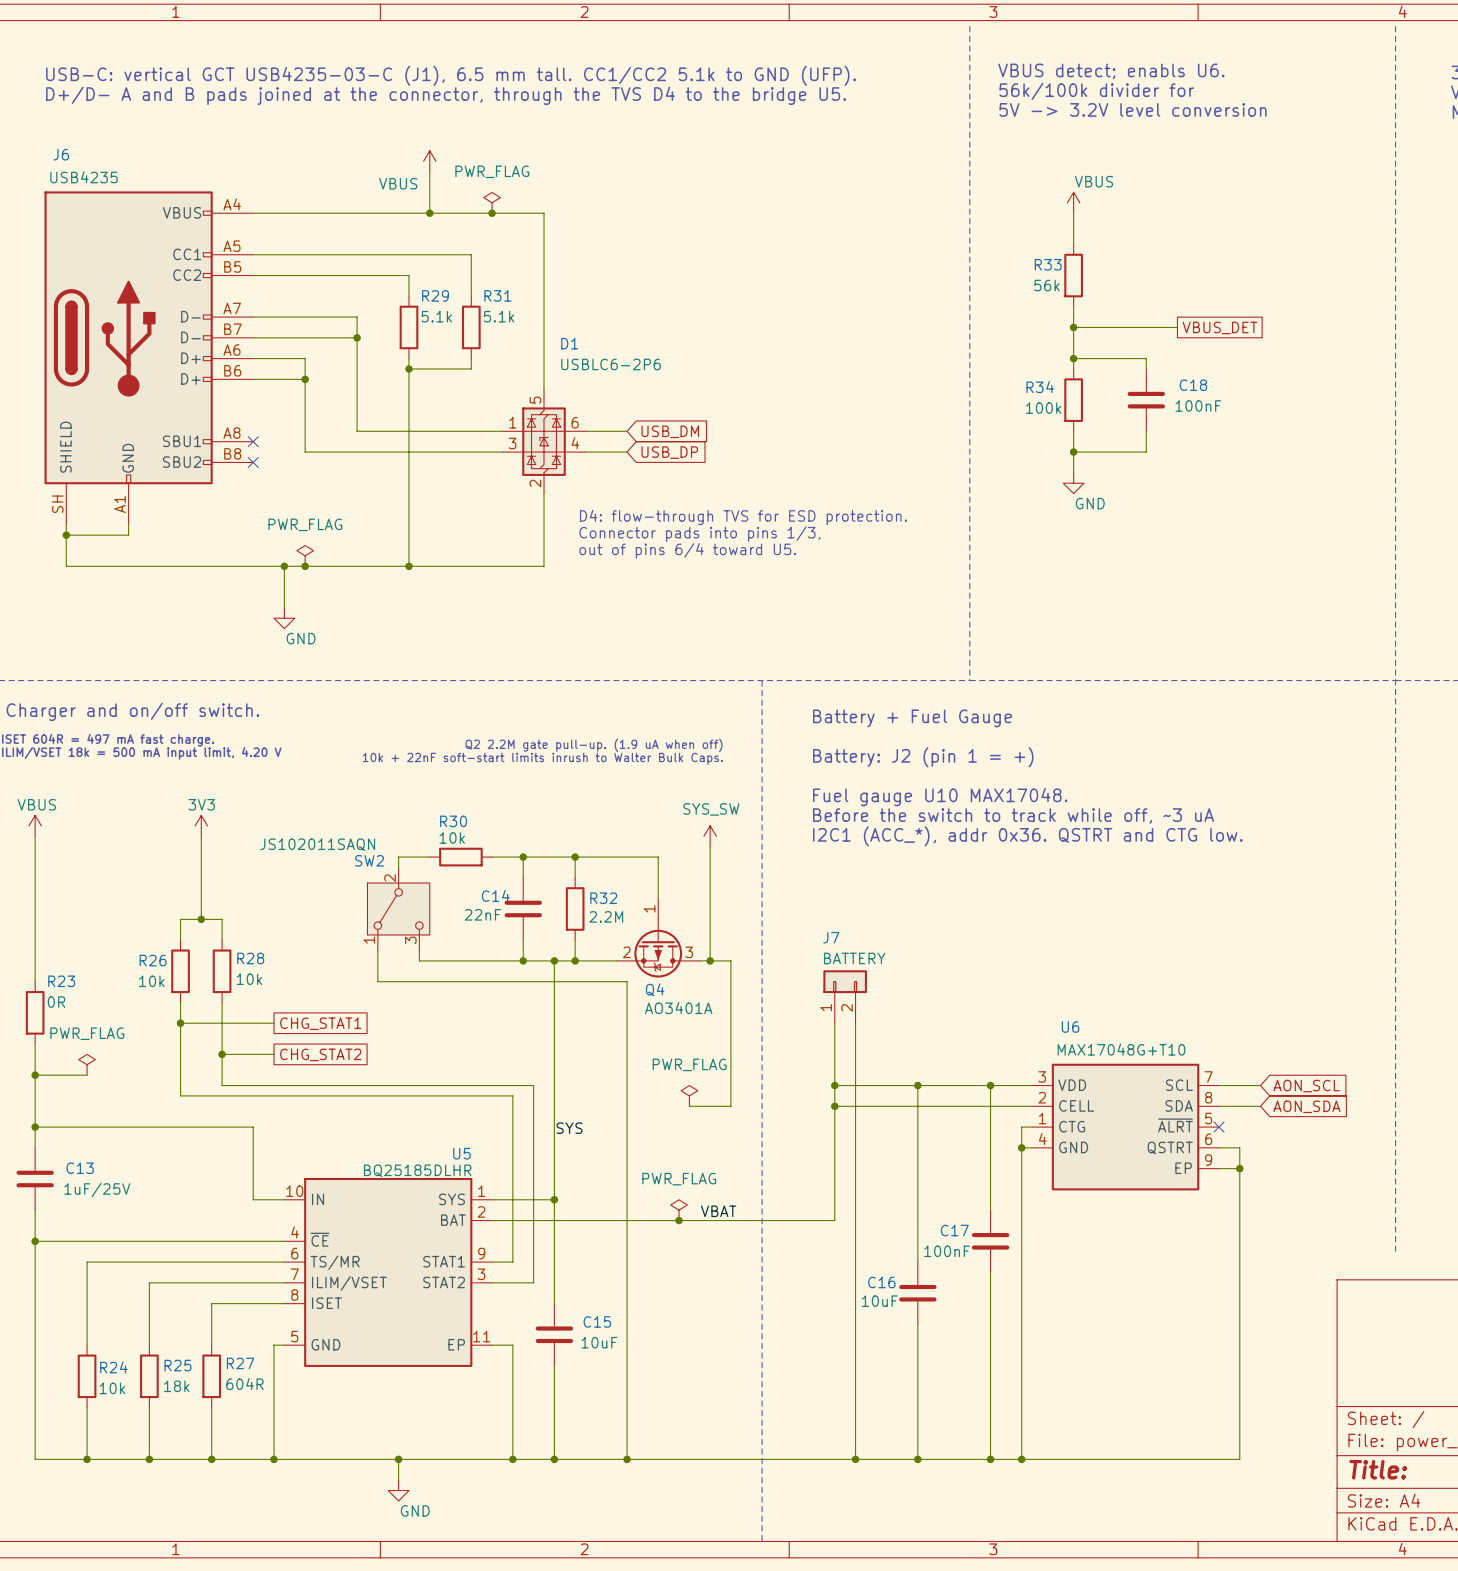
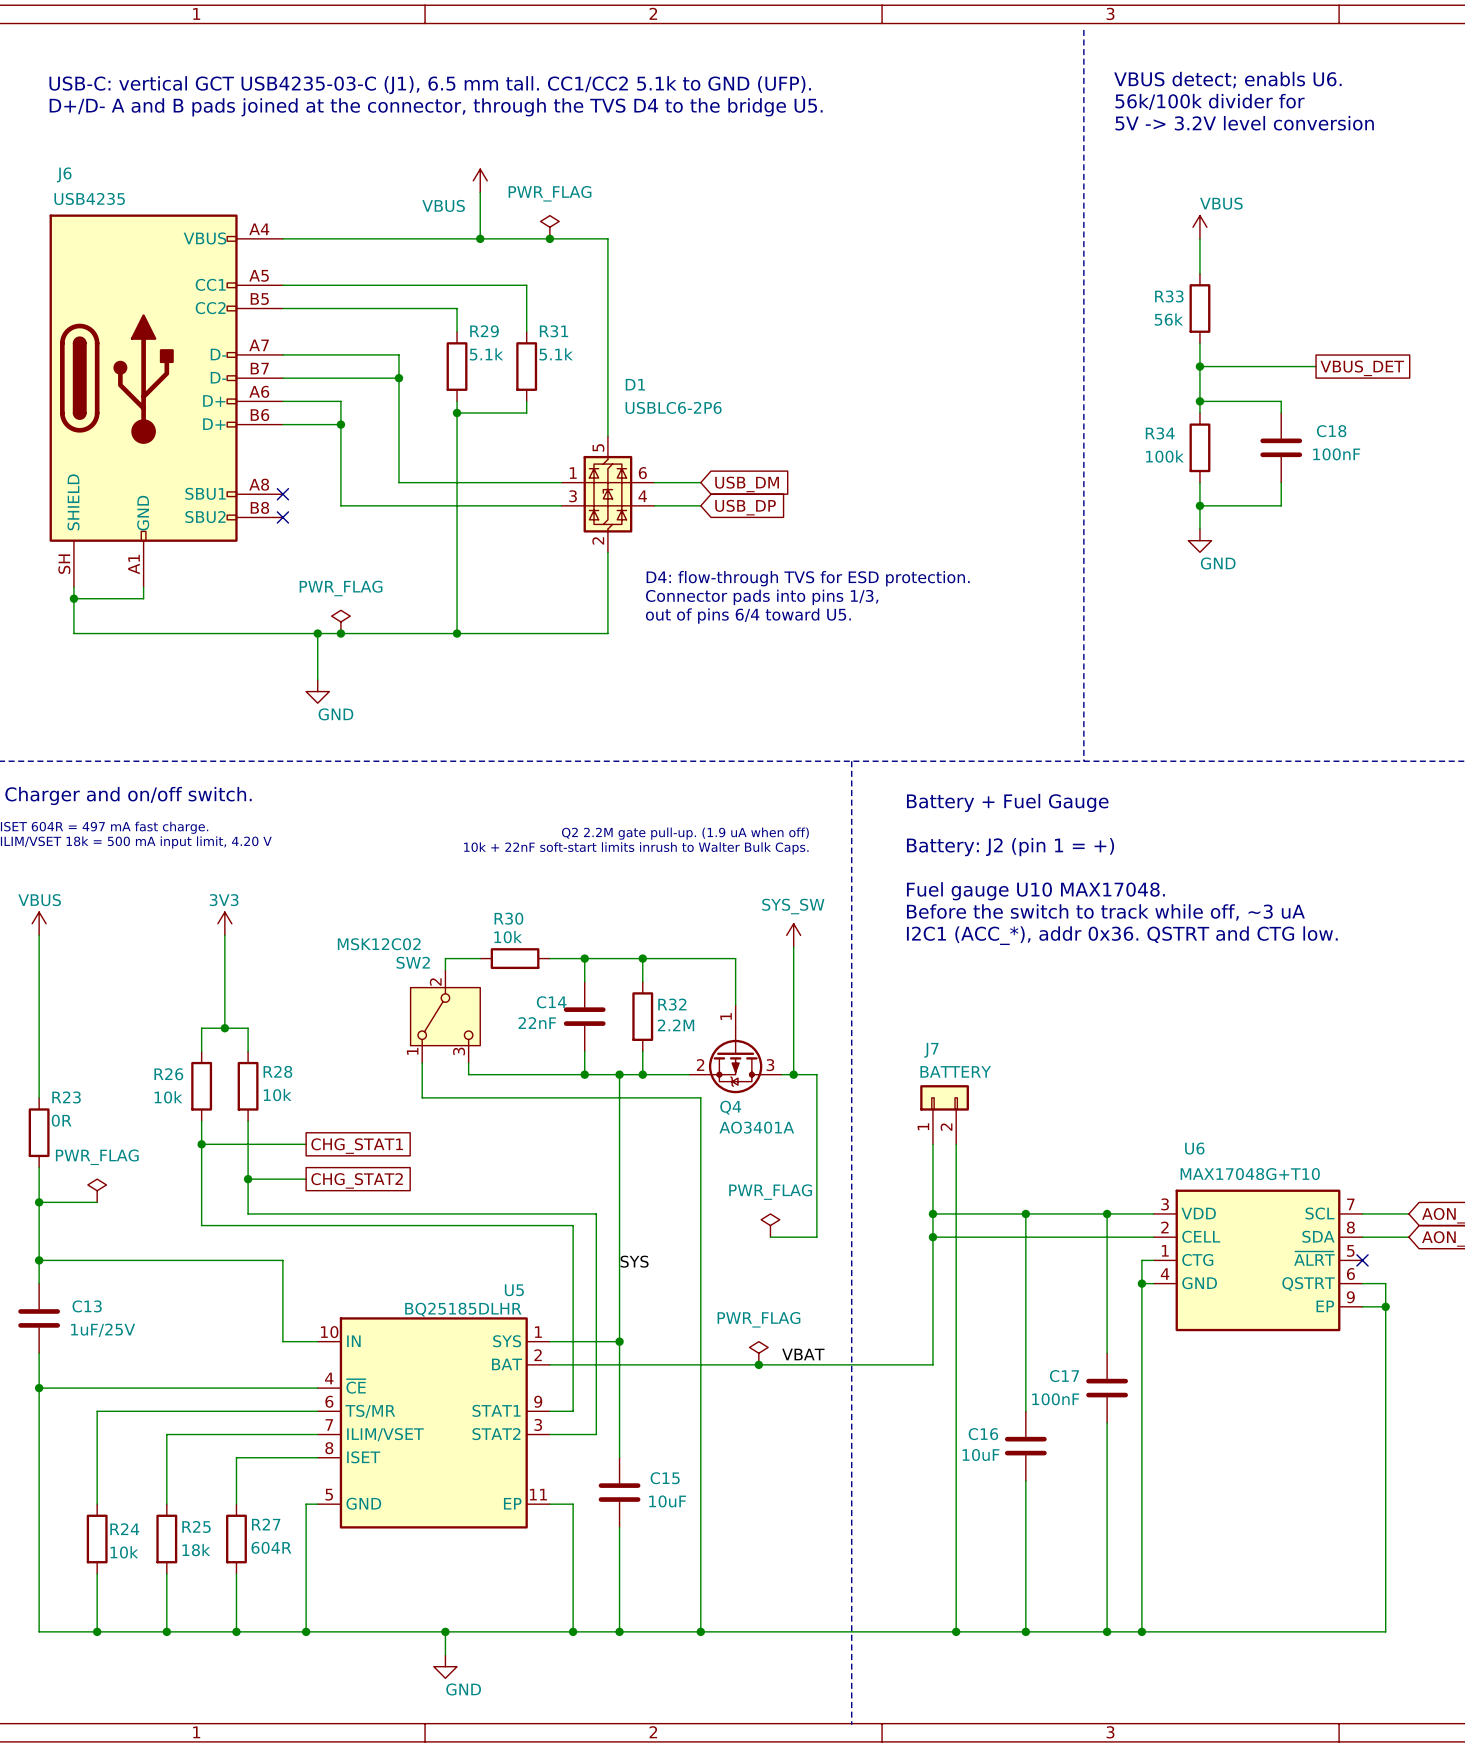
SW2 value: JS102011SAQN (317, 844) -> MSK12C02 (379, 944)

